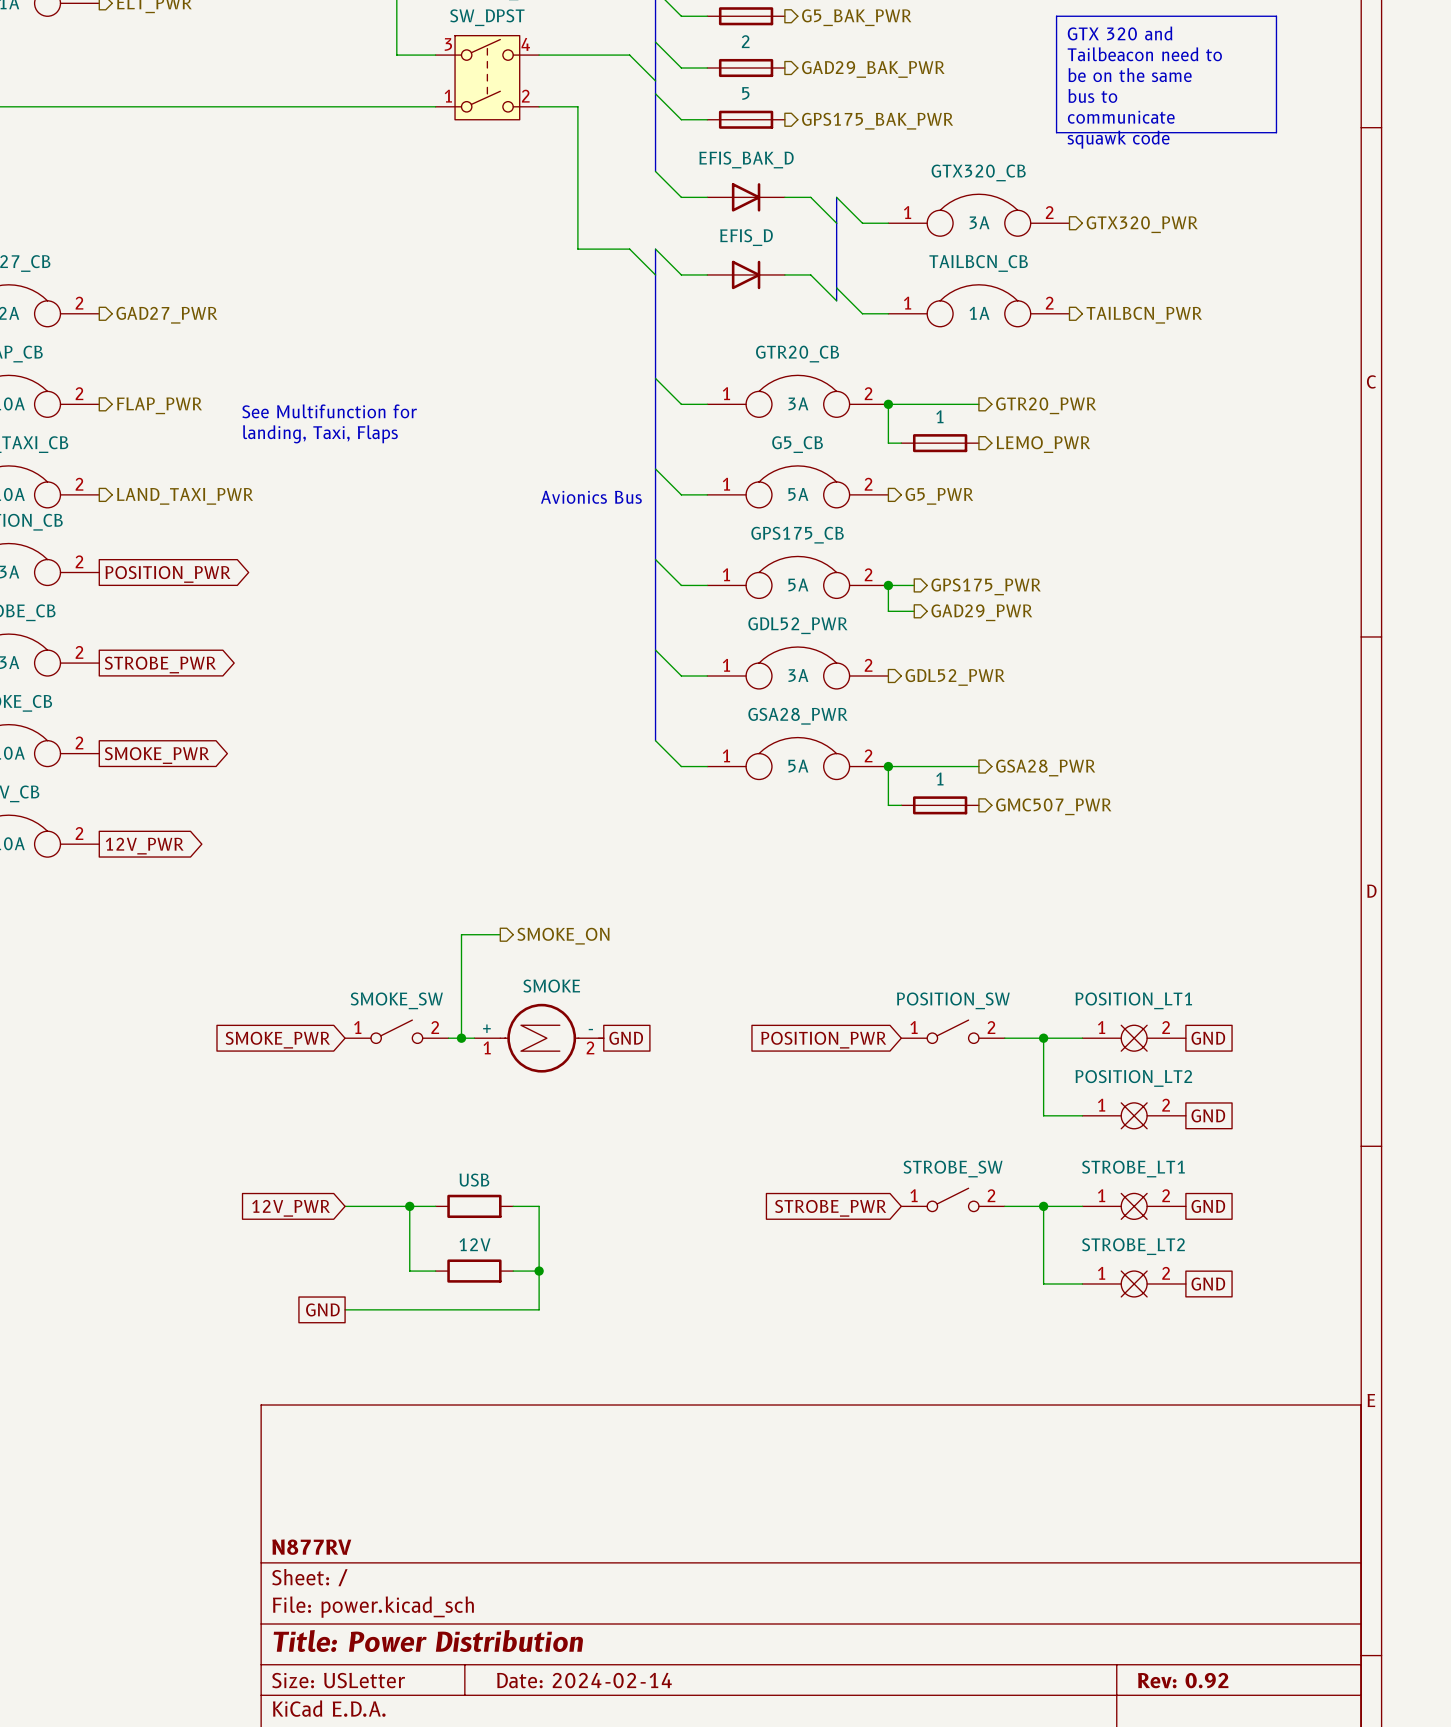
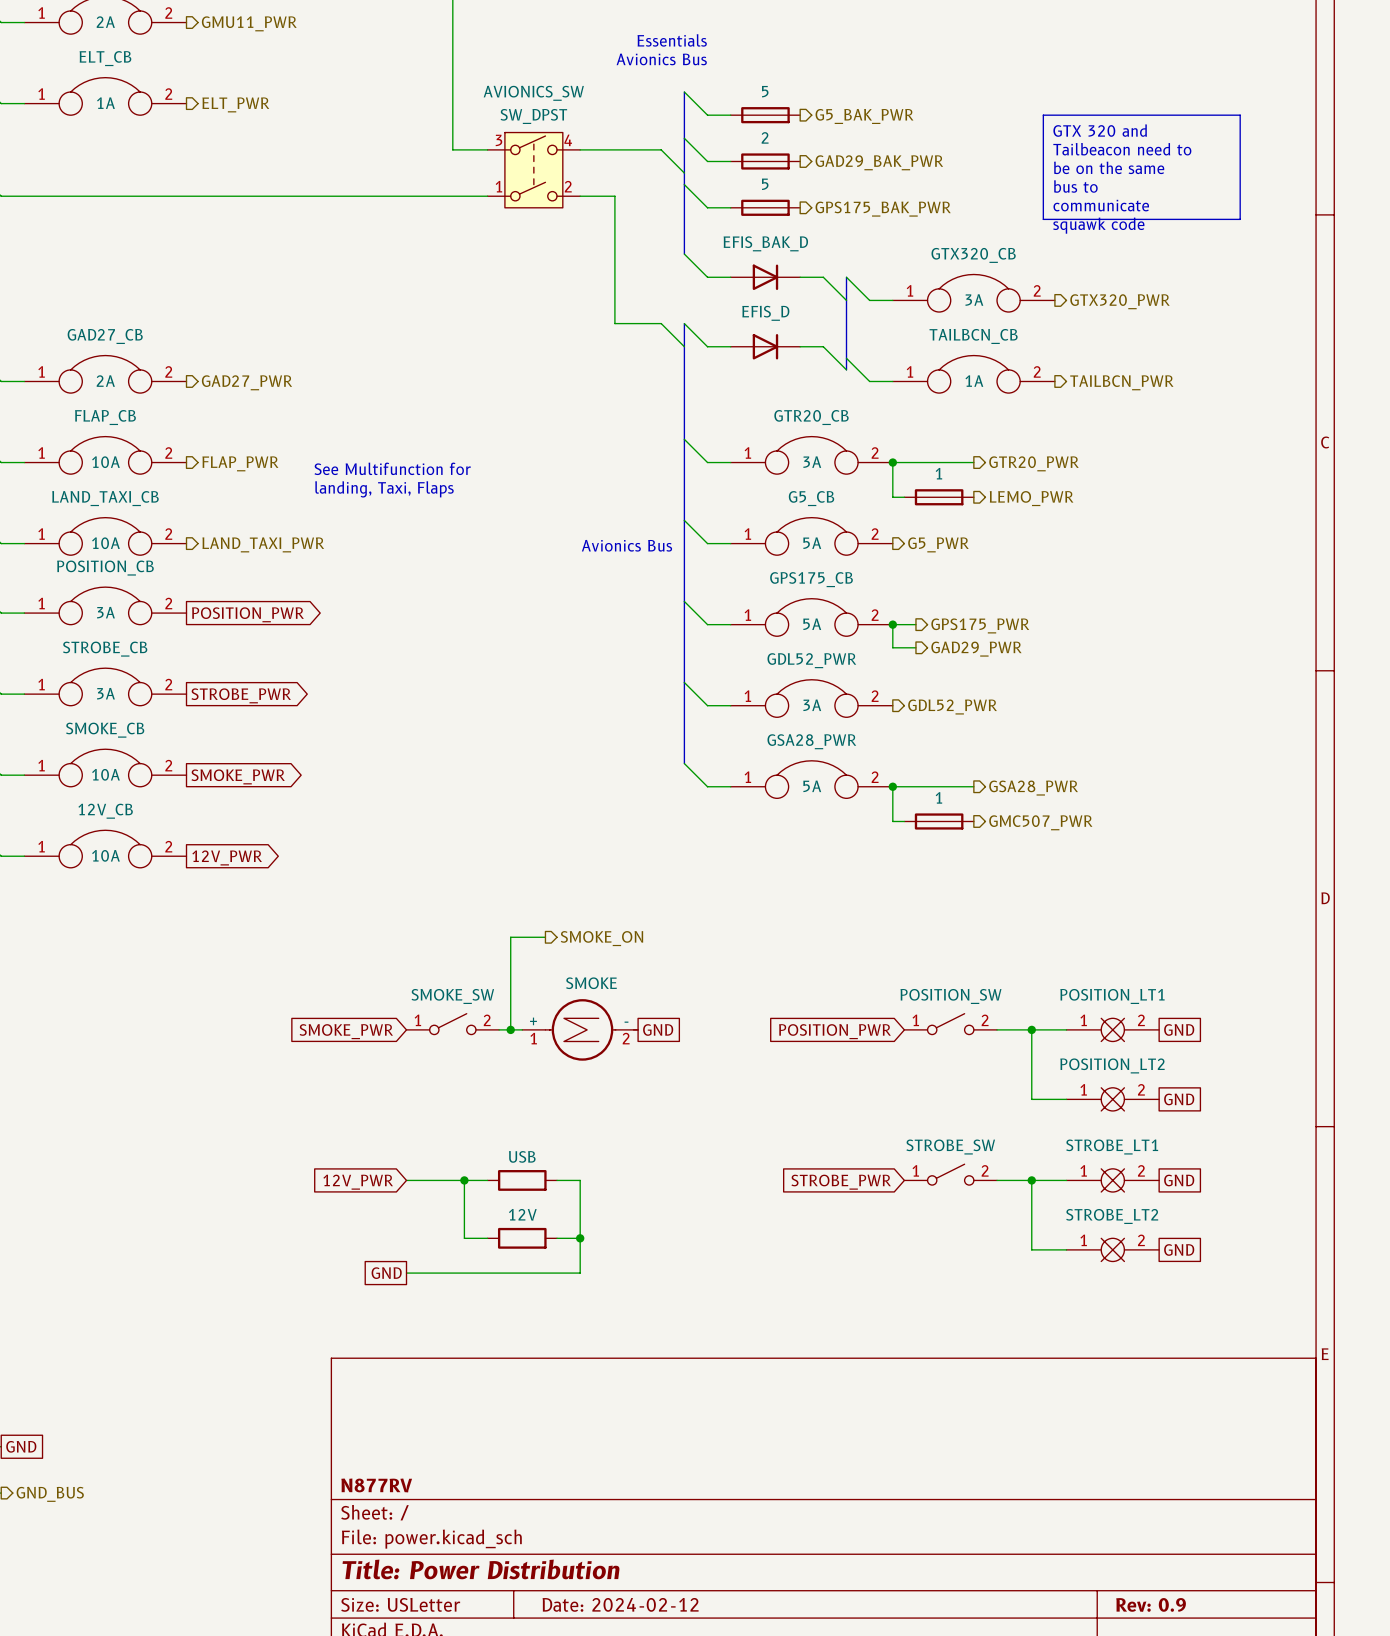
title block: Date: 2024-02-14 (584, 1680) -> Date: 2024-02-12 (620, 1604)
title block: Rev: 0.92 (1183, 1680) -> Rev: 0.9 (1151, 1604)

